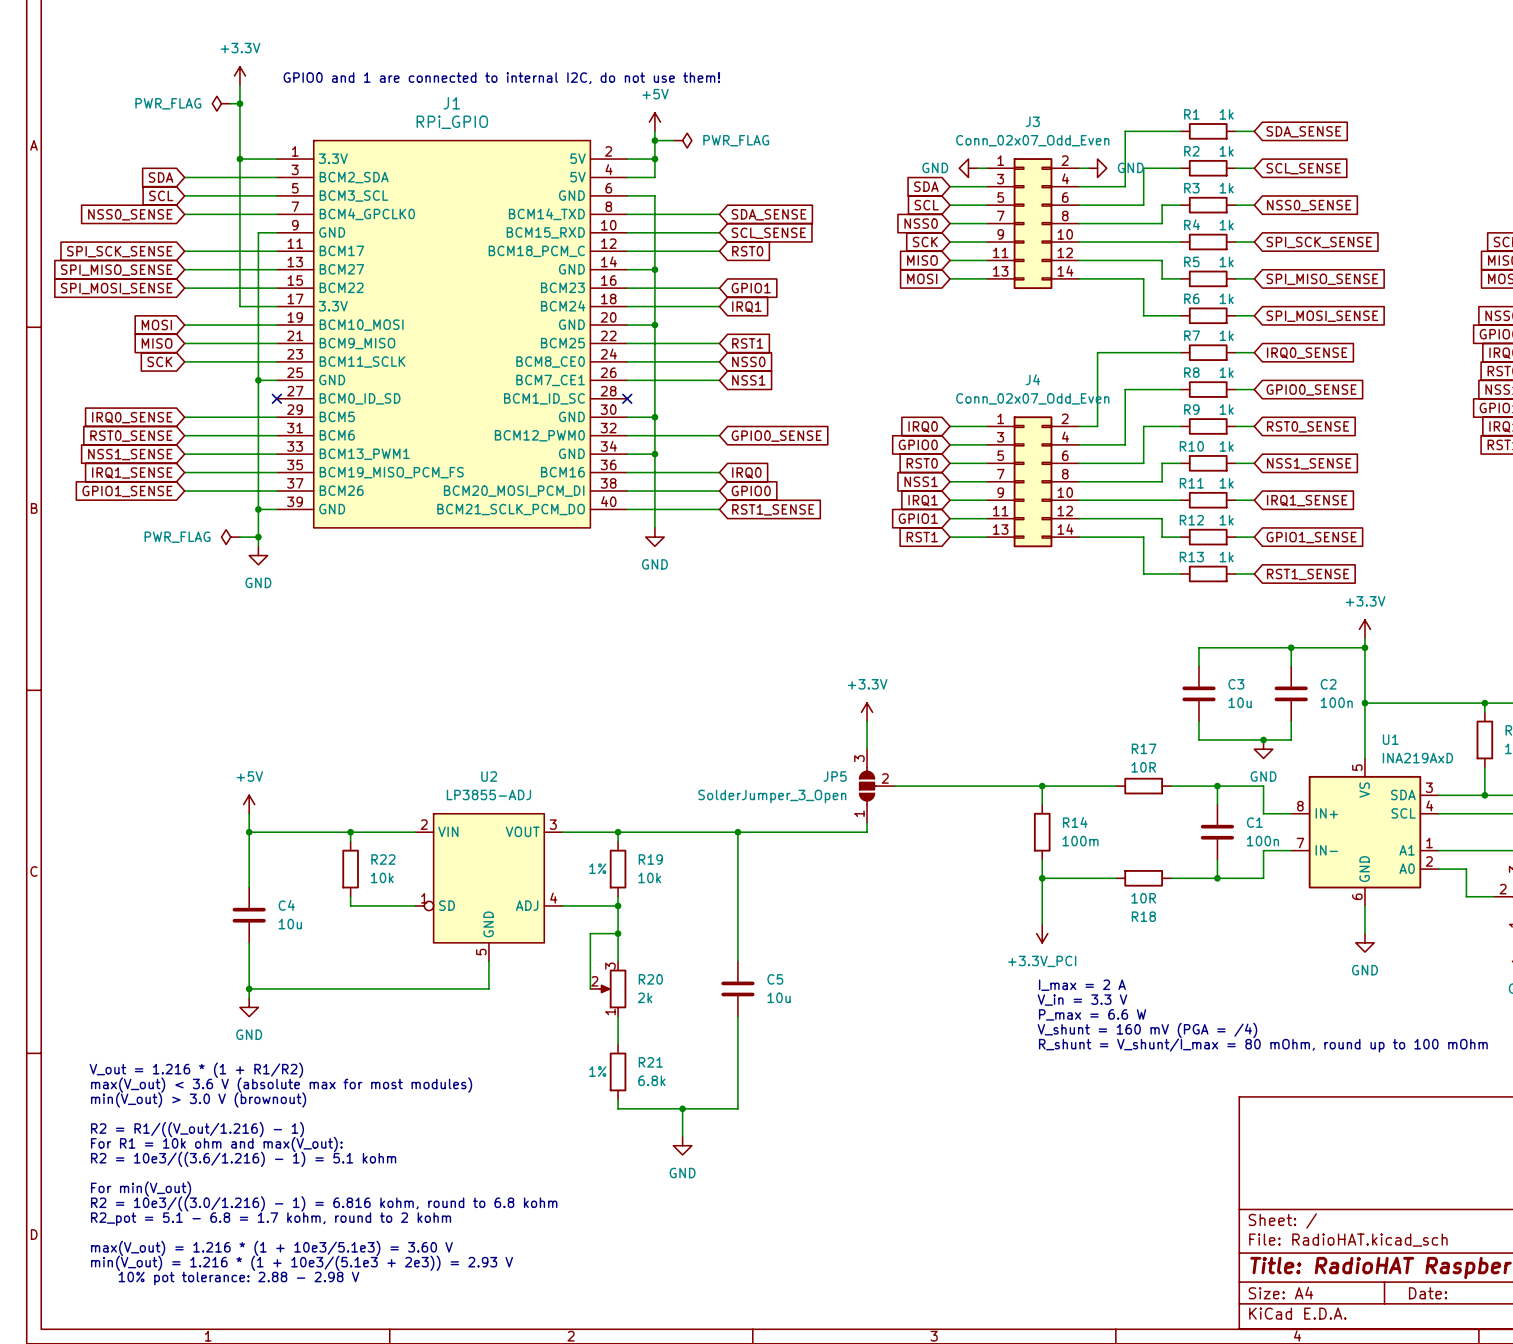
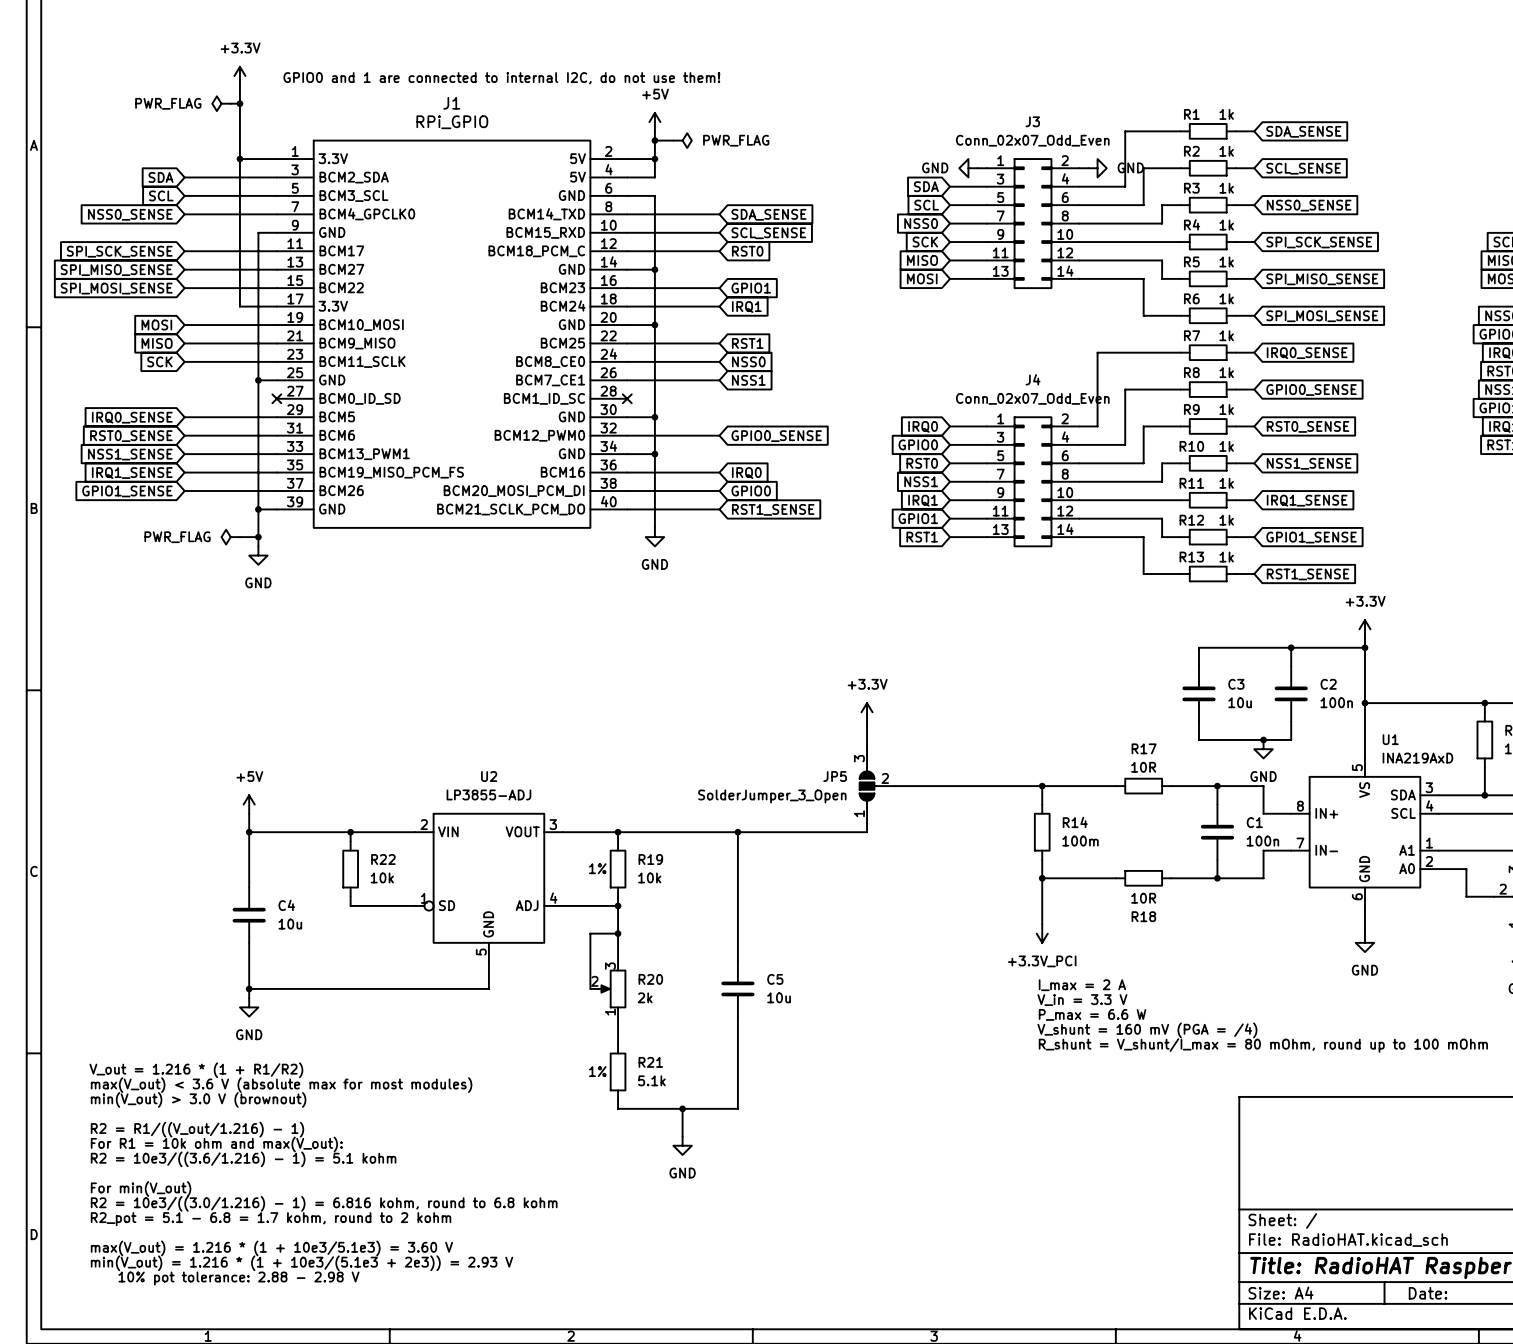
R21 value: 6.8k (651, 1080) -> 5.1k (651, 1080)

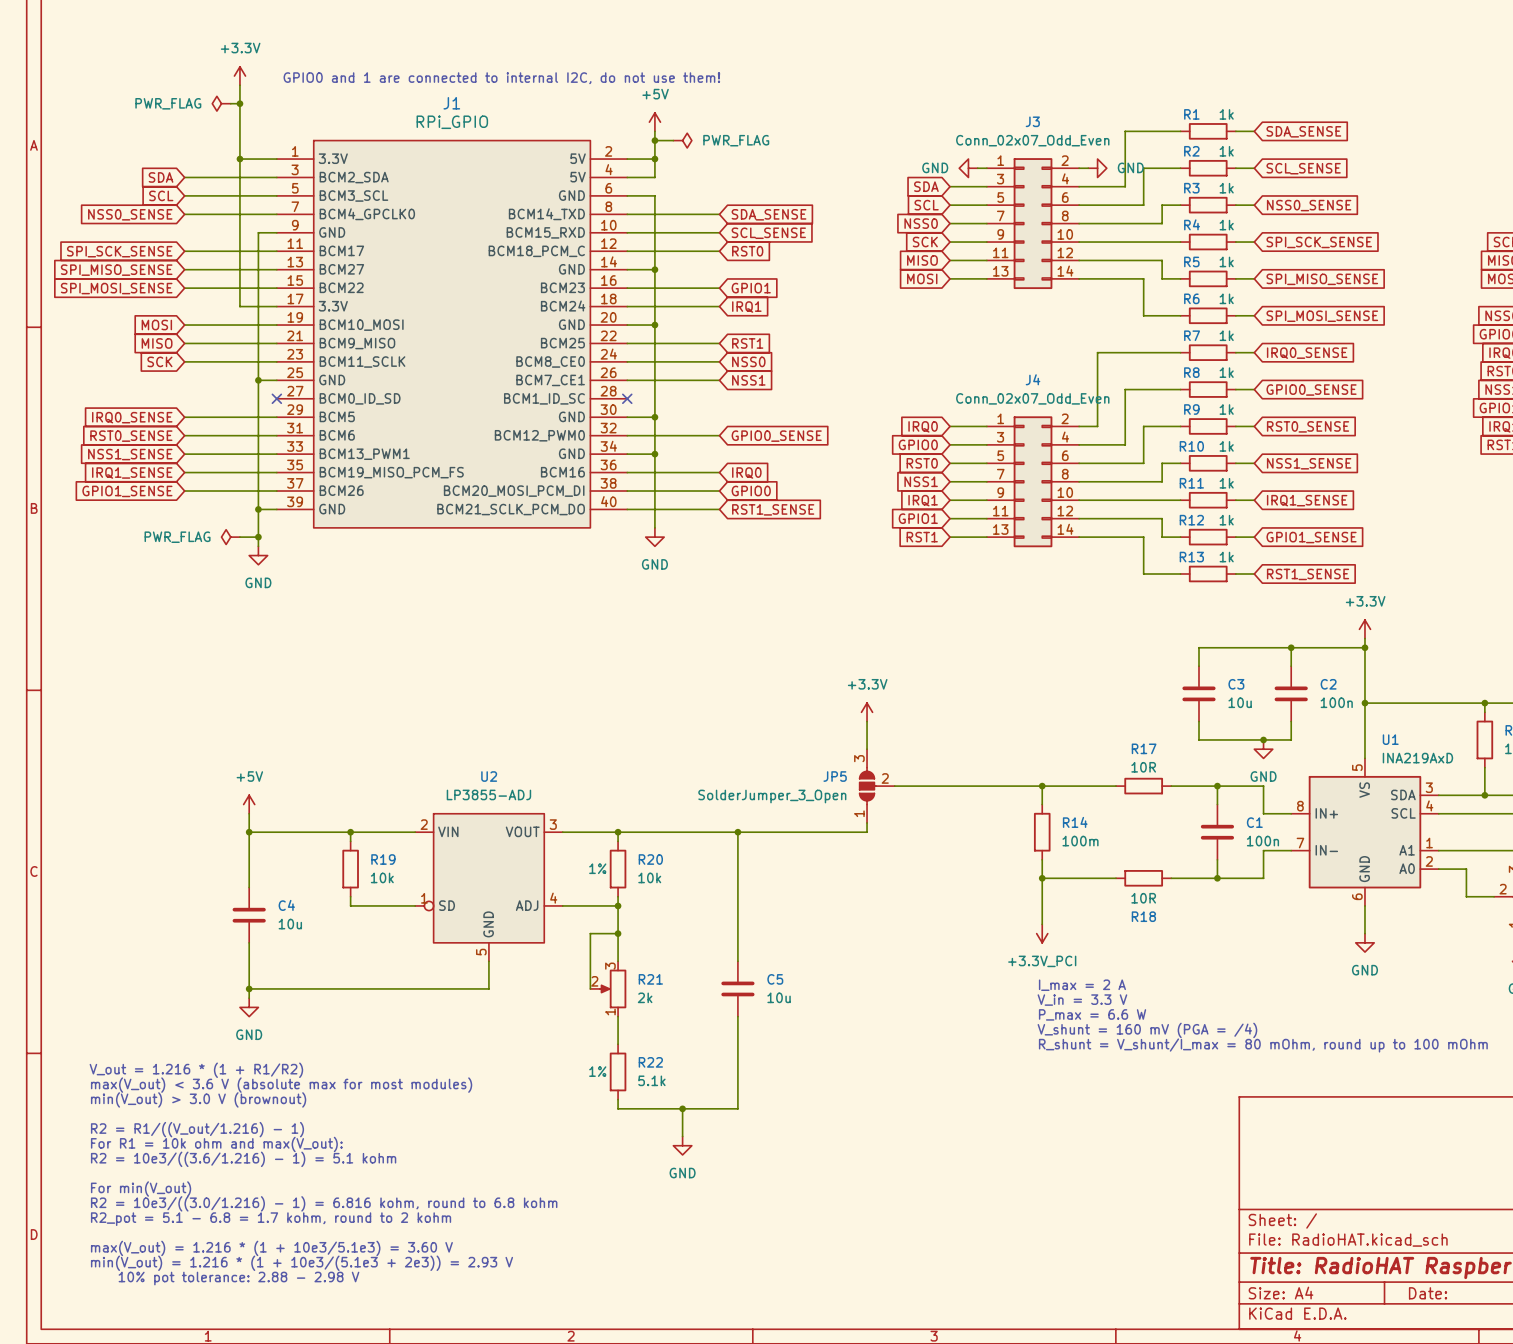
R22 name: R22 (383, 859) -> R19 (383, 859)
R19 name: R19 (650, 859) -> R20 (650, 859)
R20 name: R20 (650, 979) -> R21 (650, 979)
R21 name: R21 (650, 1062) -> R22 (650, 1062)

